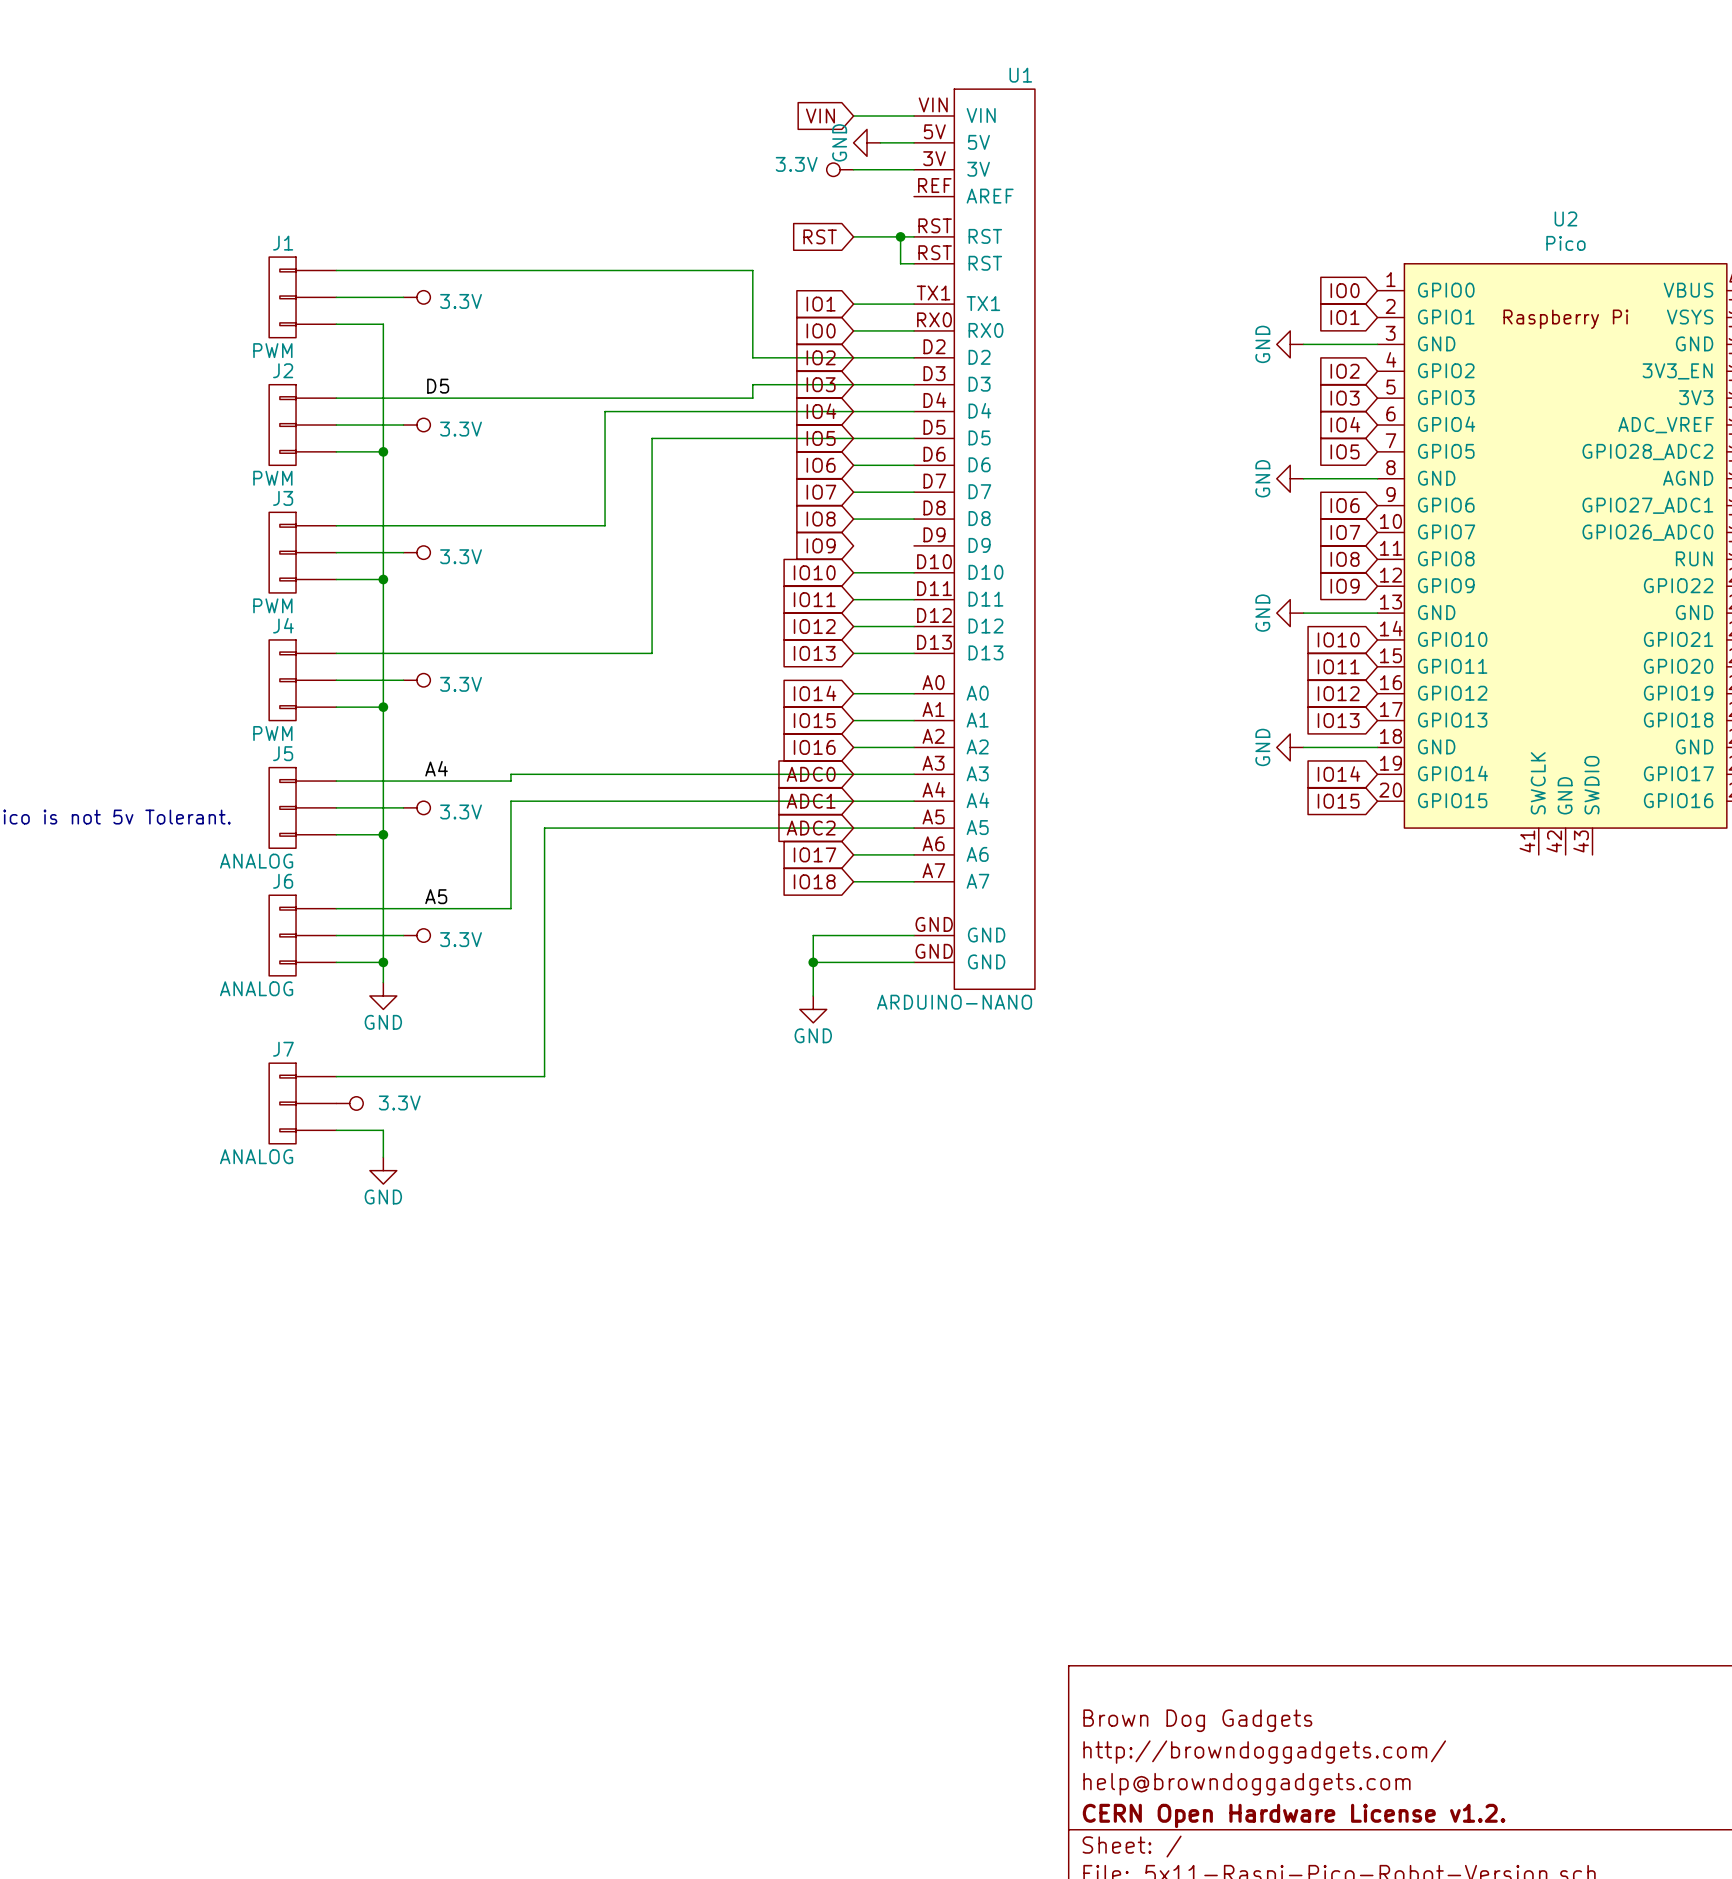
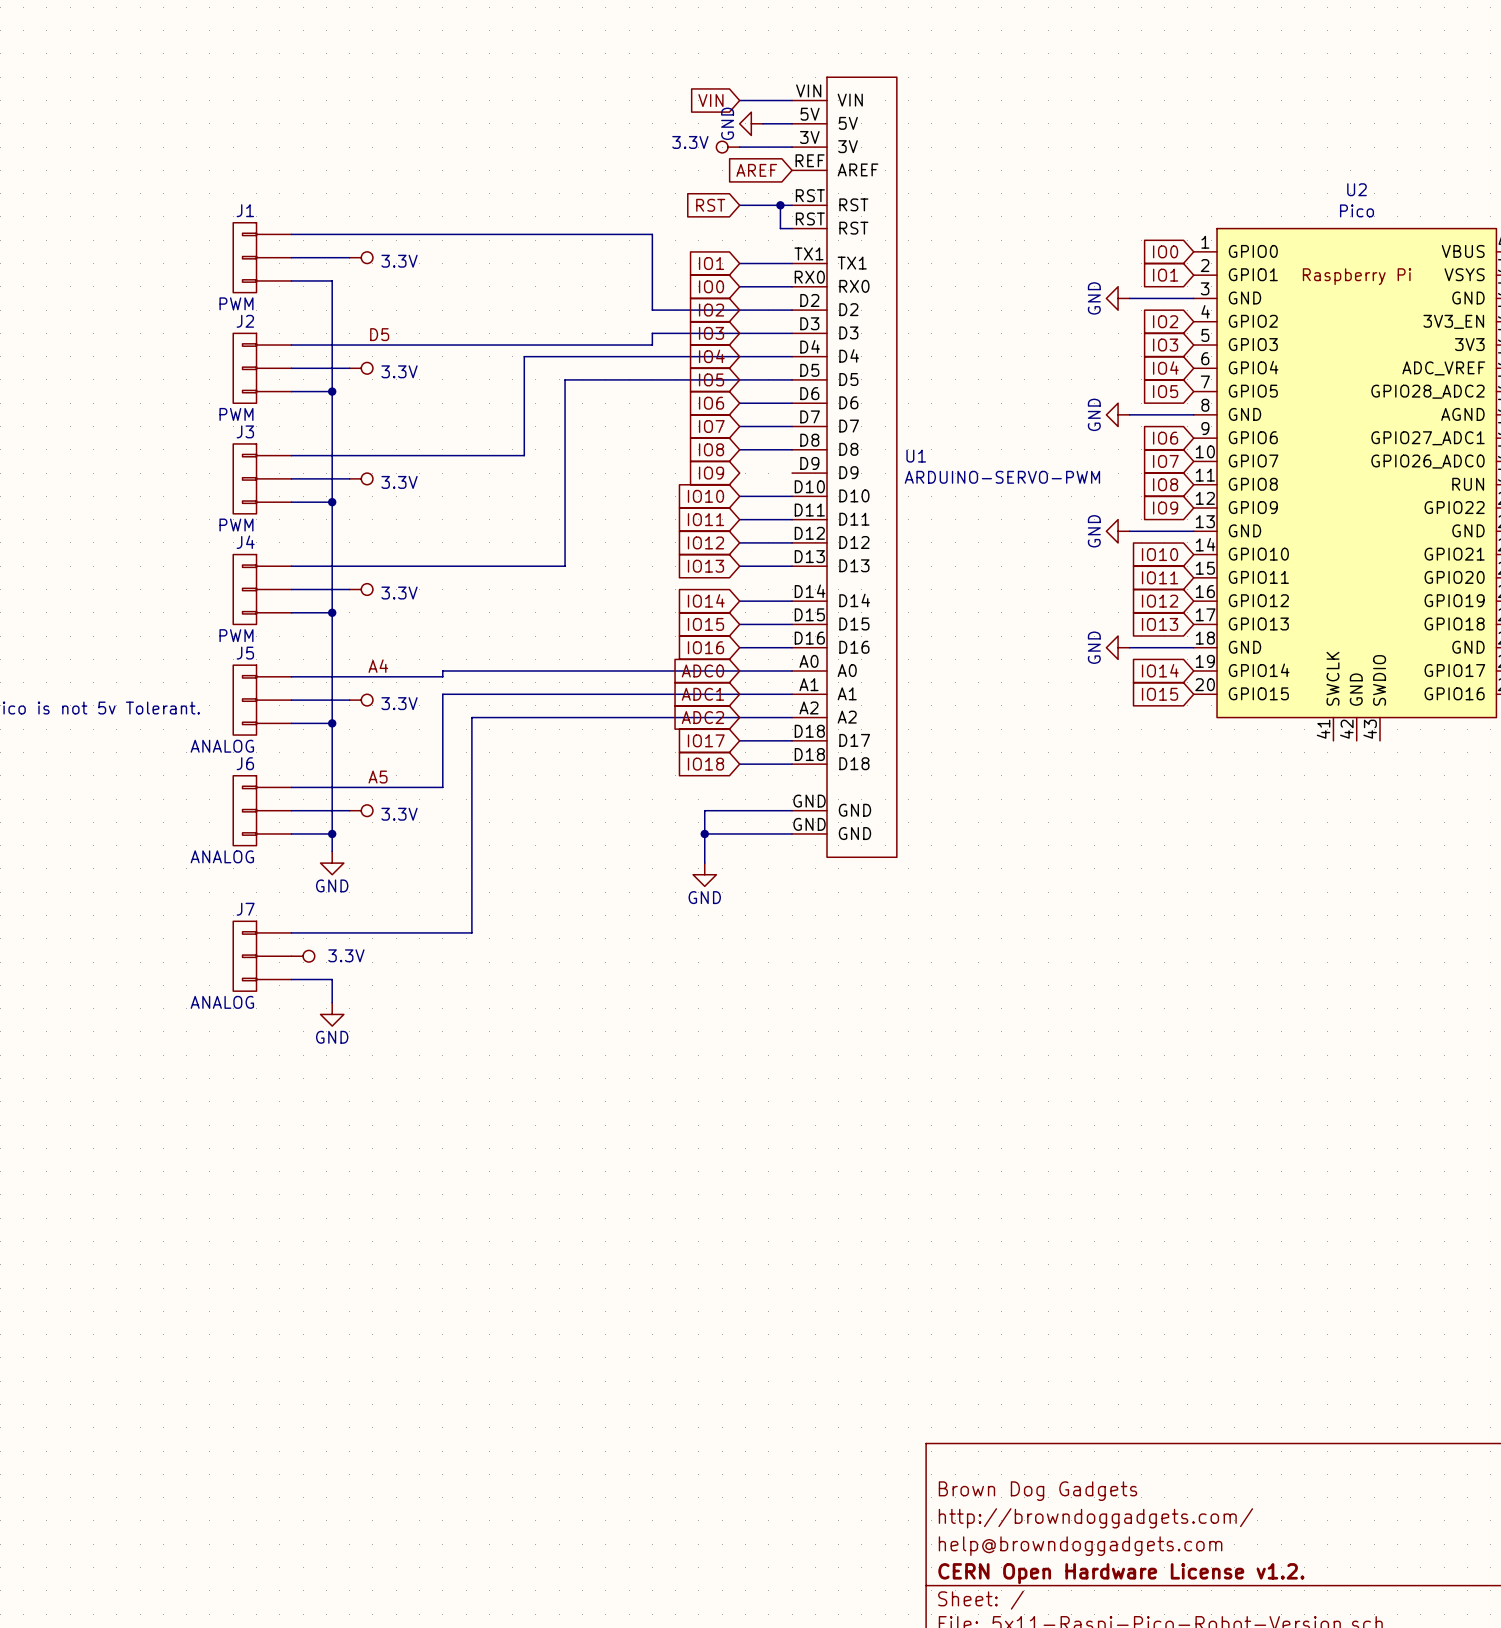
U1 name position: U1 (1020, 75) -> U1 (916, 456)
U1 symbol: [914, 89, 1035, 990] -> [792, 77, 897, 858]
global label: none -> AREF (756, 170)
U1 value: ARDUINO-NANO (954, 1002) -> ARDUINO-SERVO-PWM (1002, 477)

